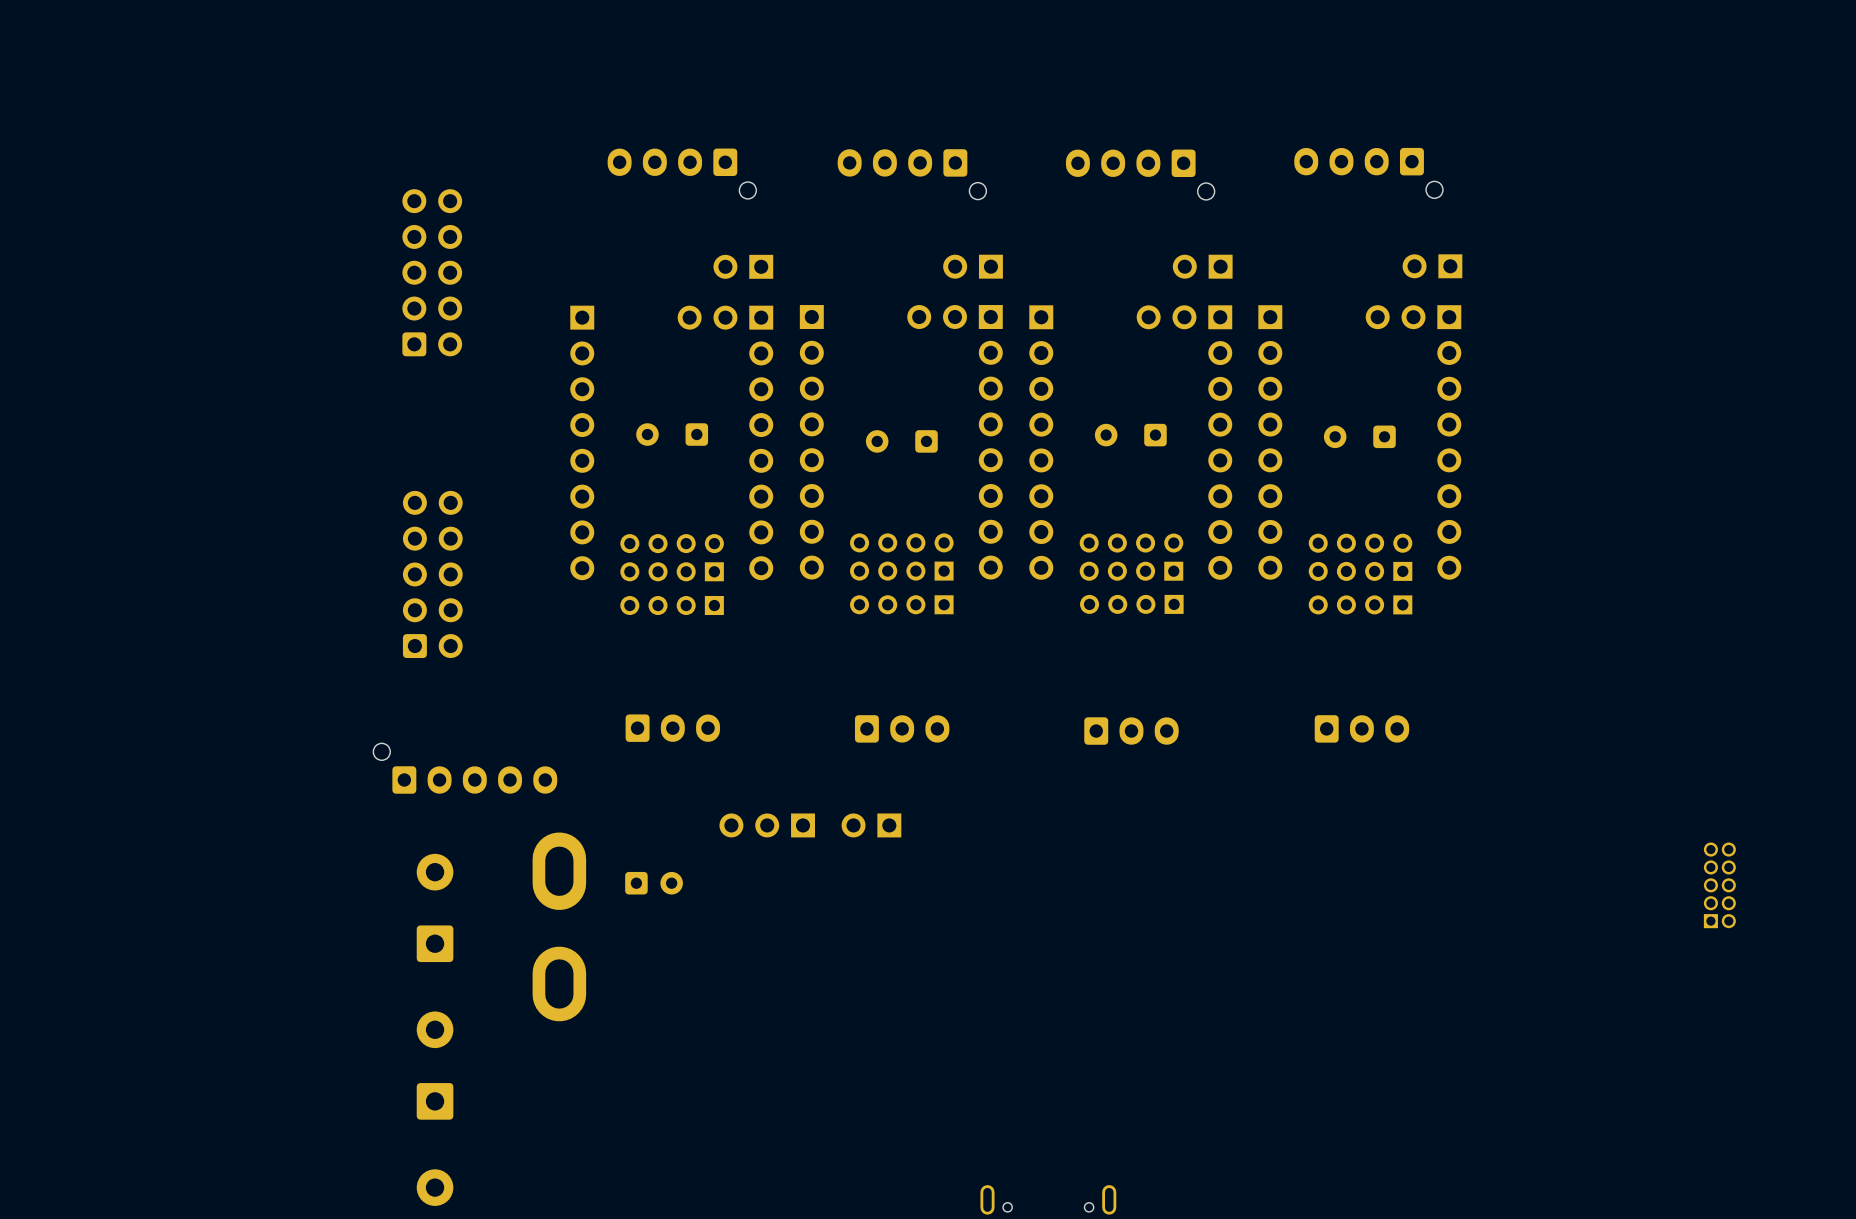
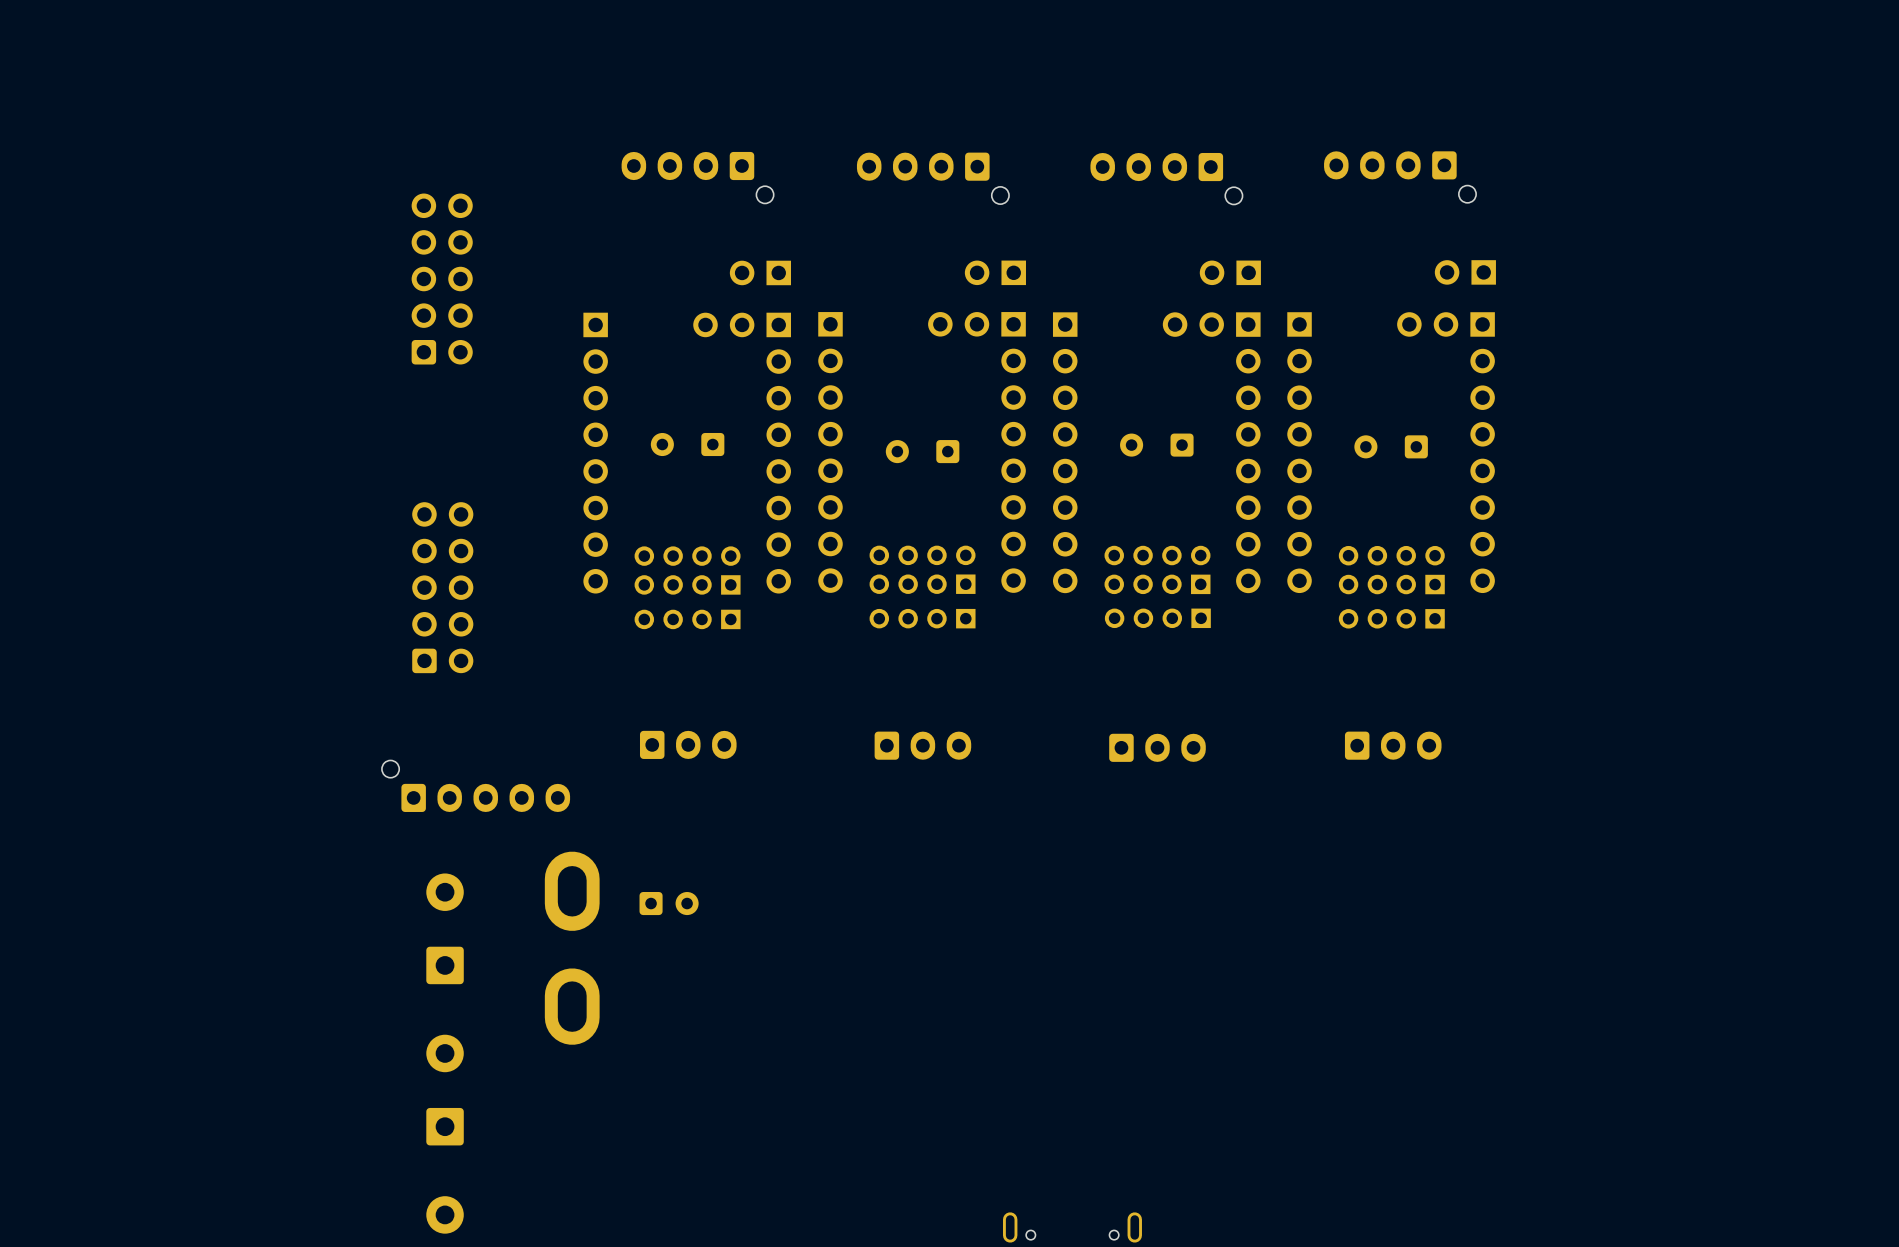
part: (767, 825) -> none
part: (871, 825) -> none
part: (1719, 885) -> none

